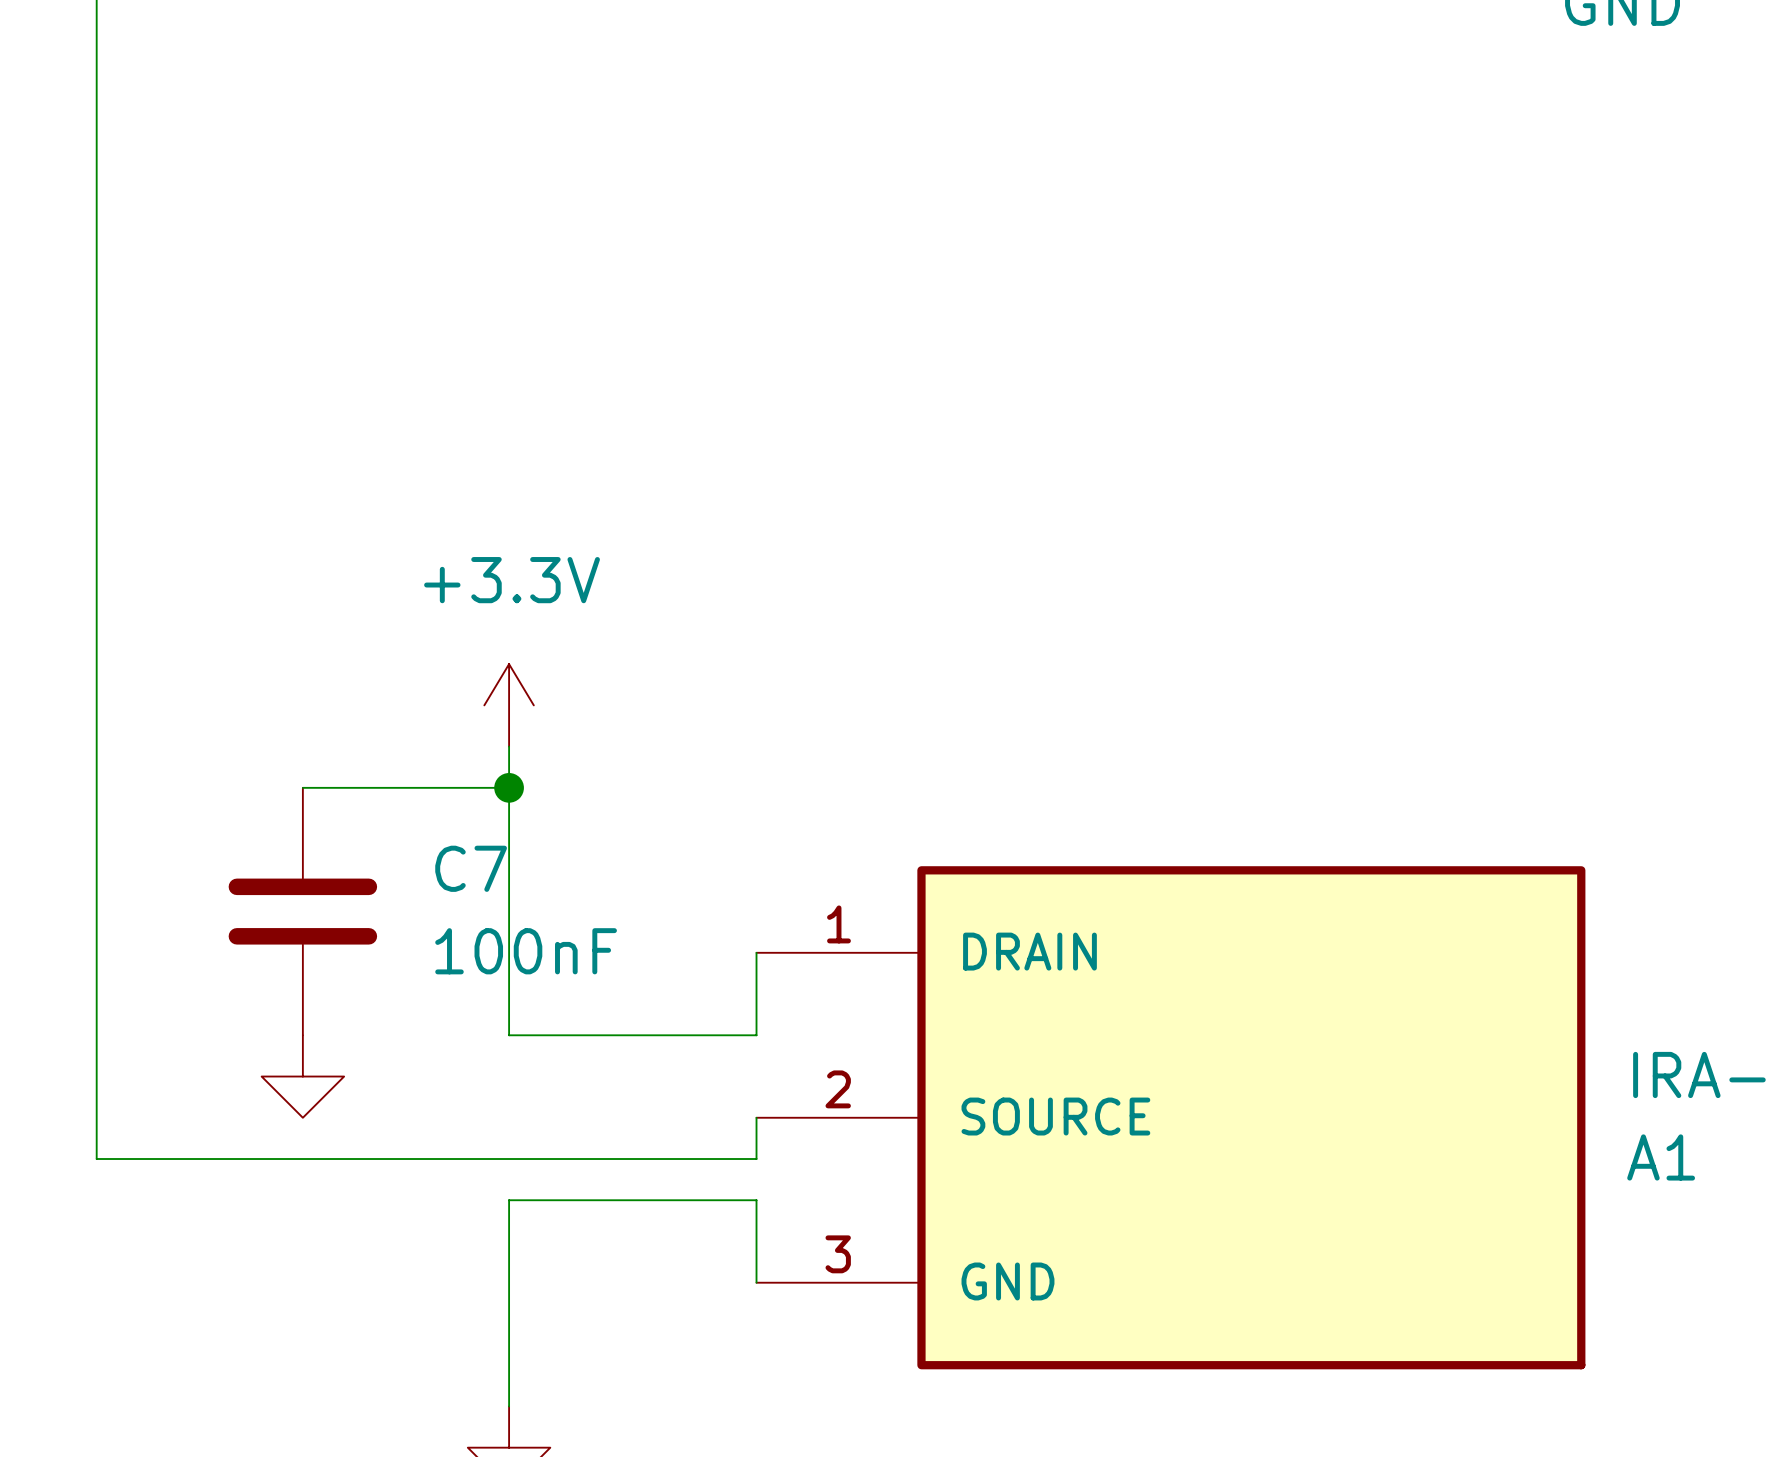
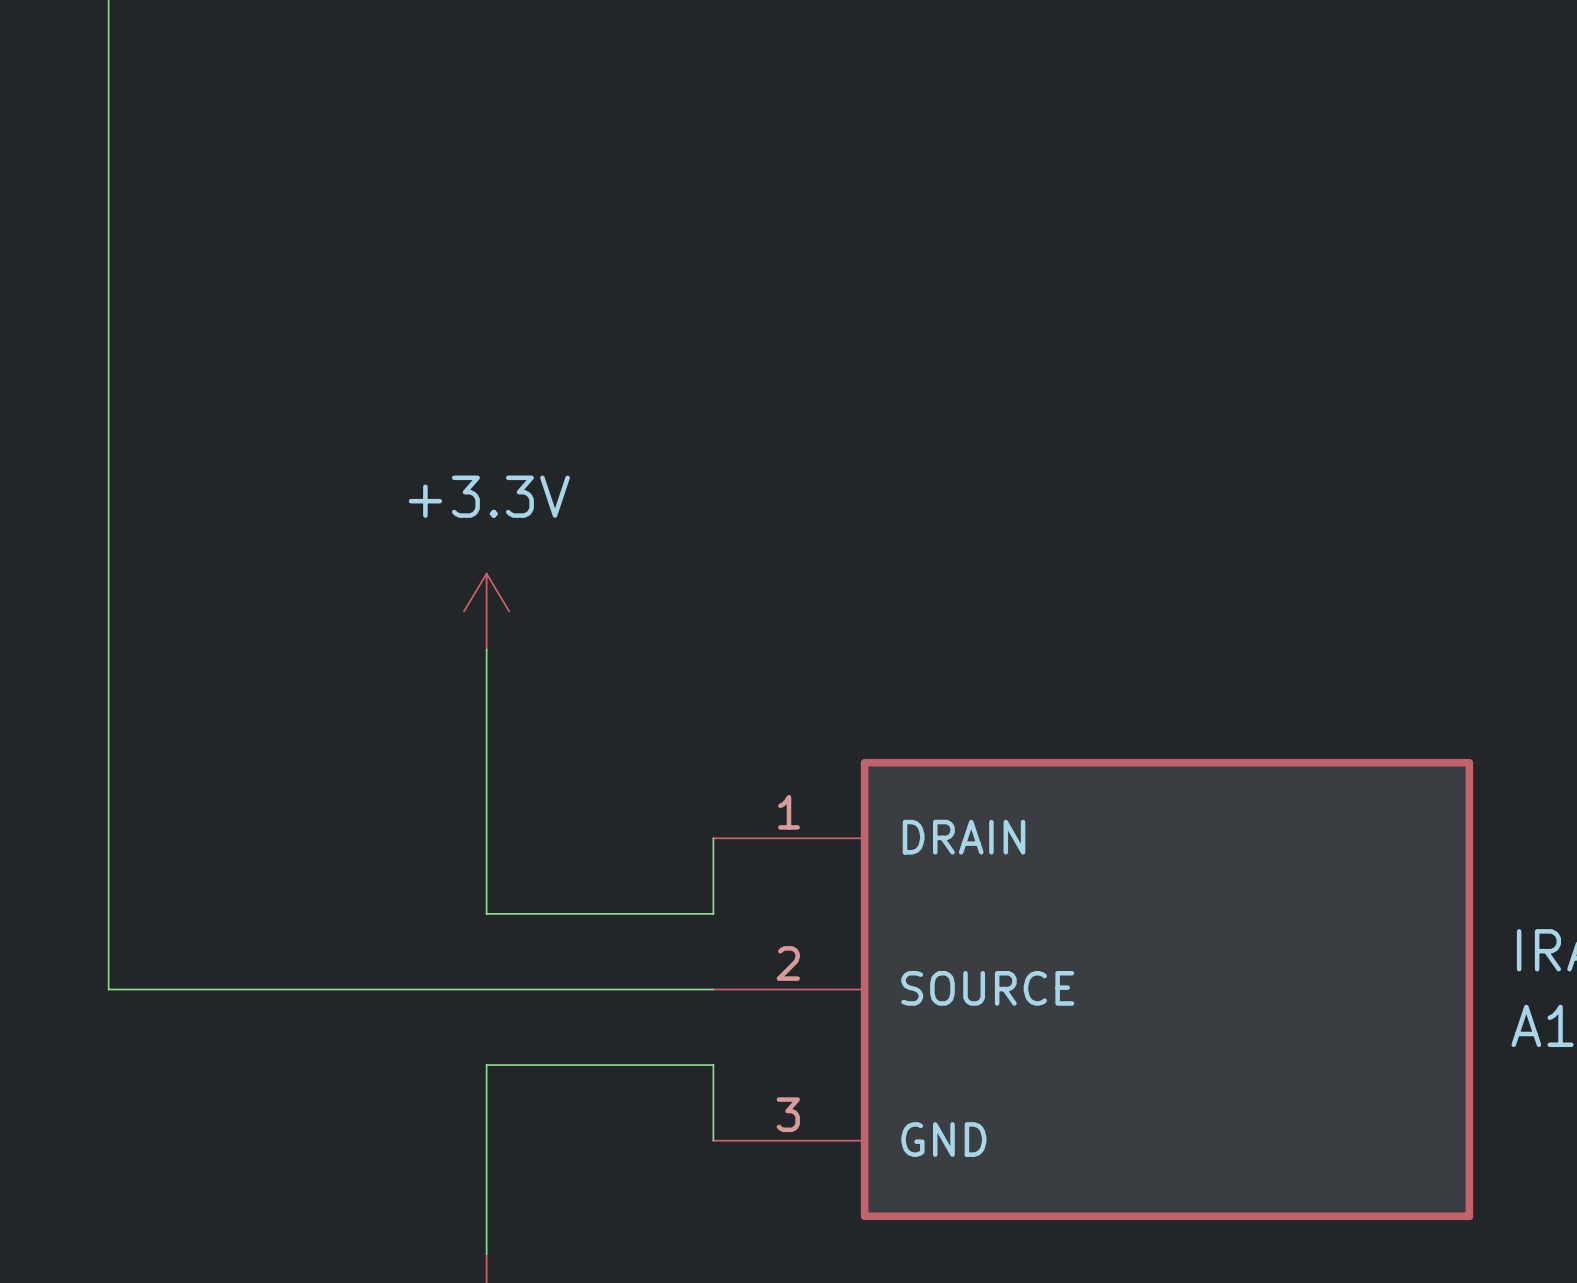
wire: (302, 787) (509, 787) -> none
junction: (509, 787) -> none
C7: 100nF (302, 911) -> none
power symbol: (302, 1076) -> none
wire: (96, 1117) (96, 1159) (756, 1159) (756, 1117) -> (108, 989) (713, 989)

